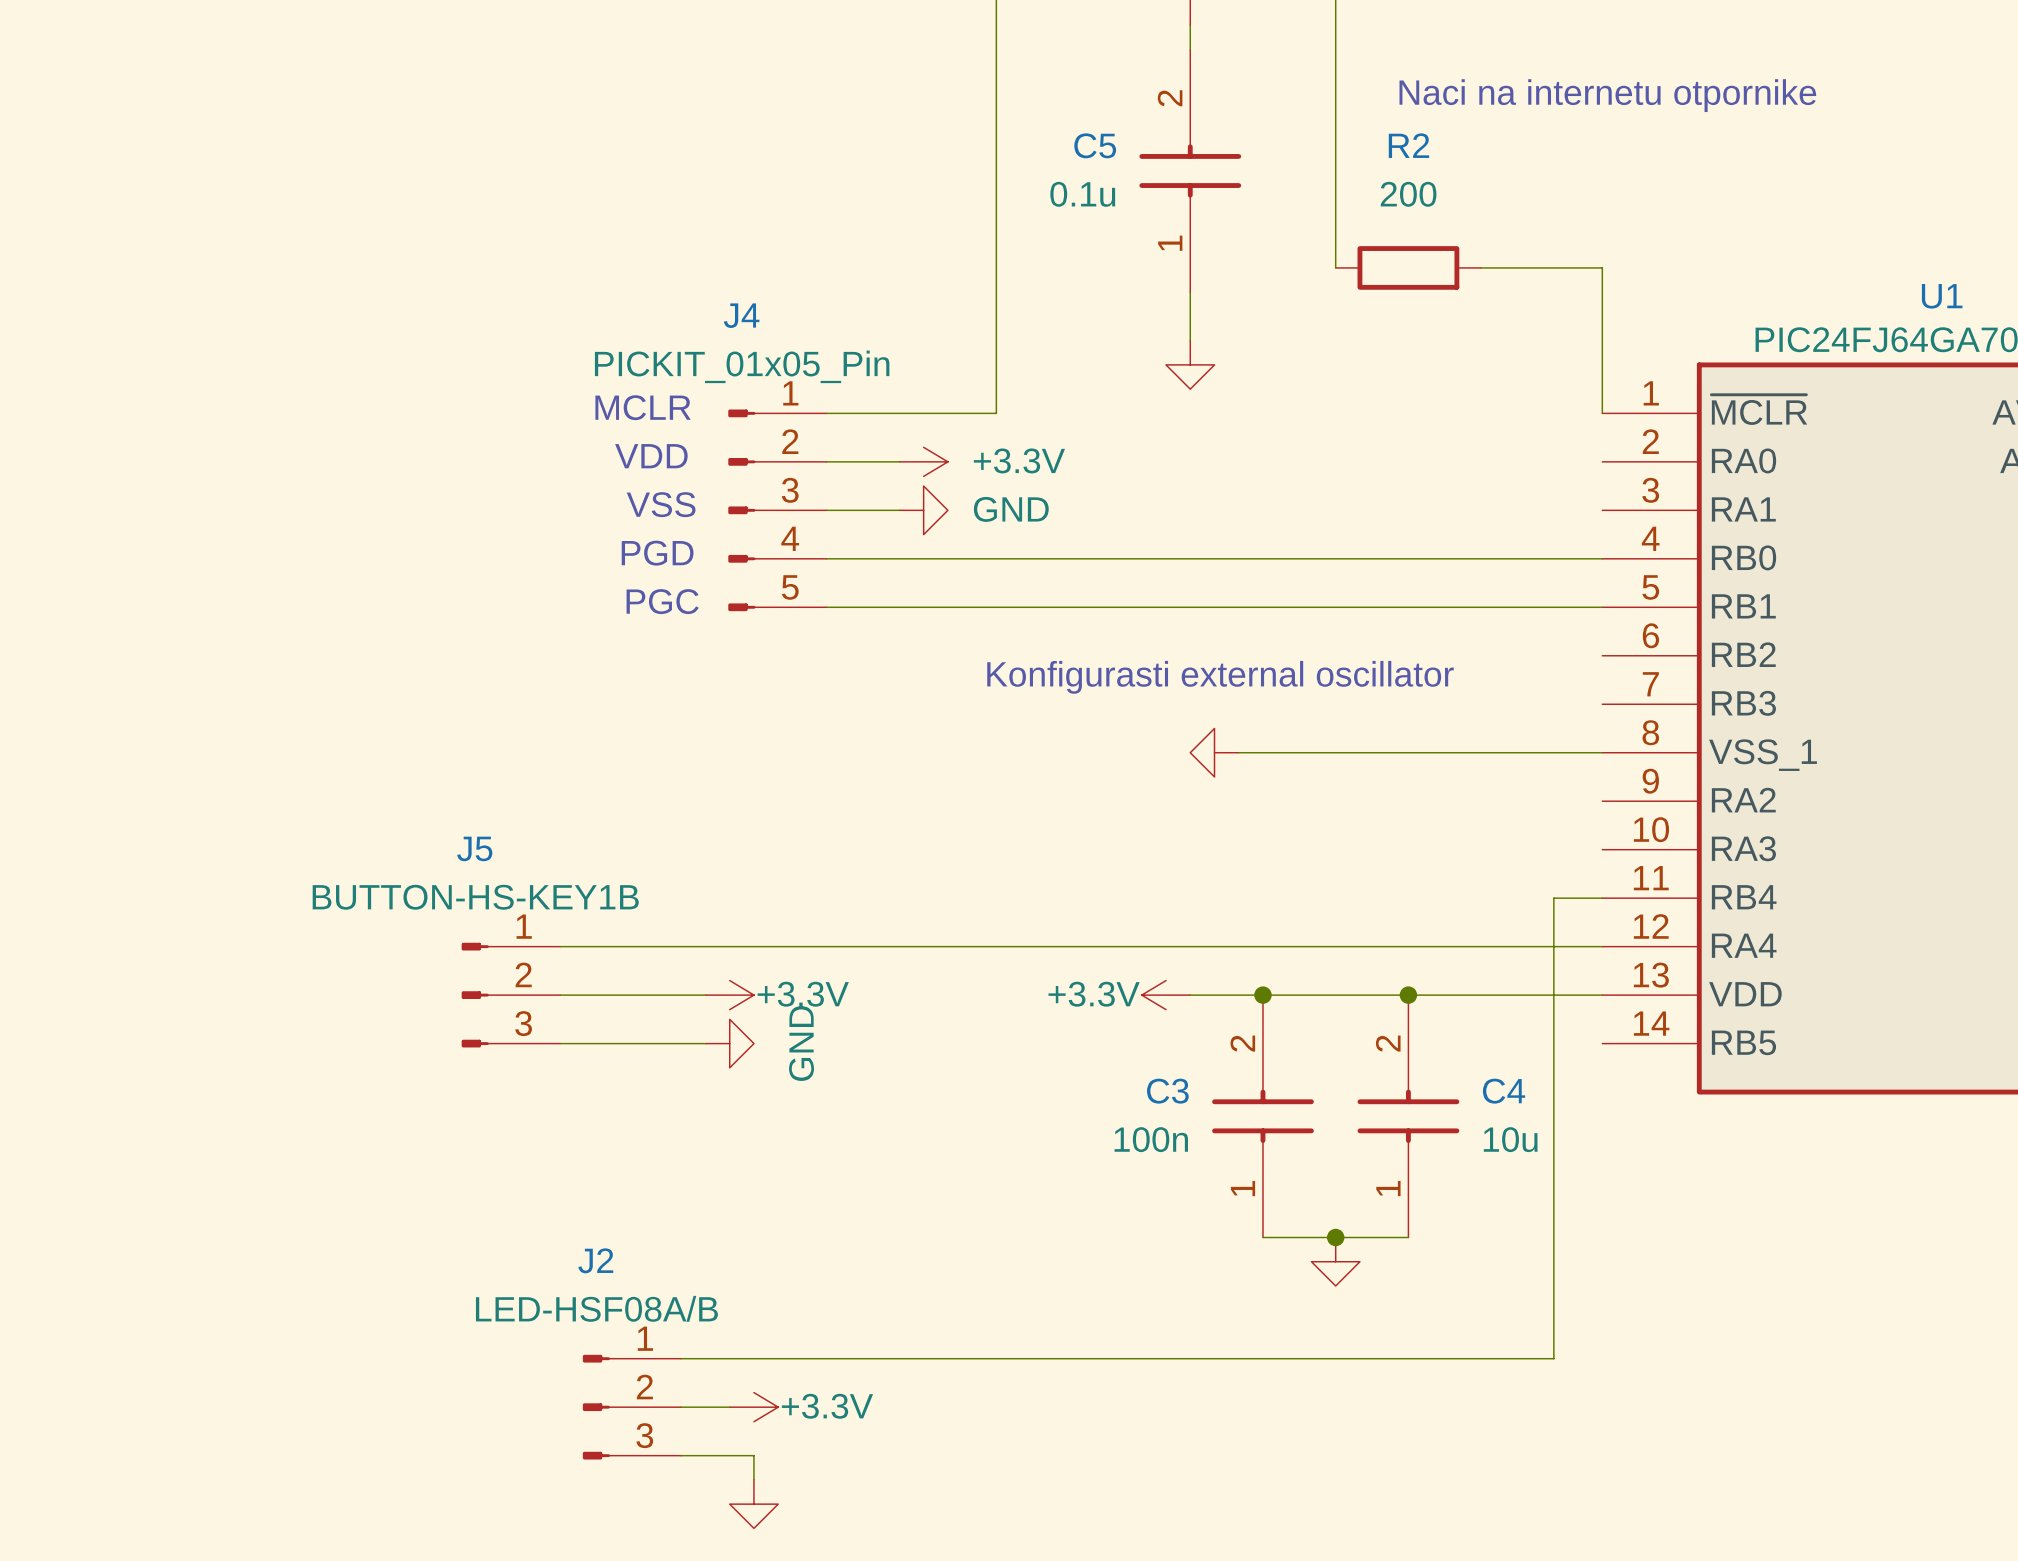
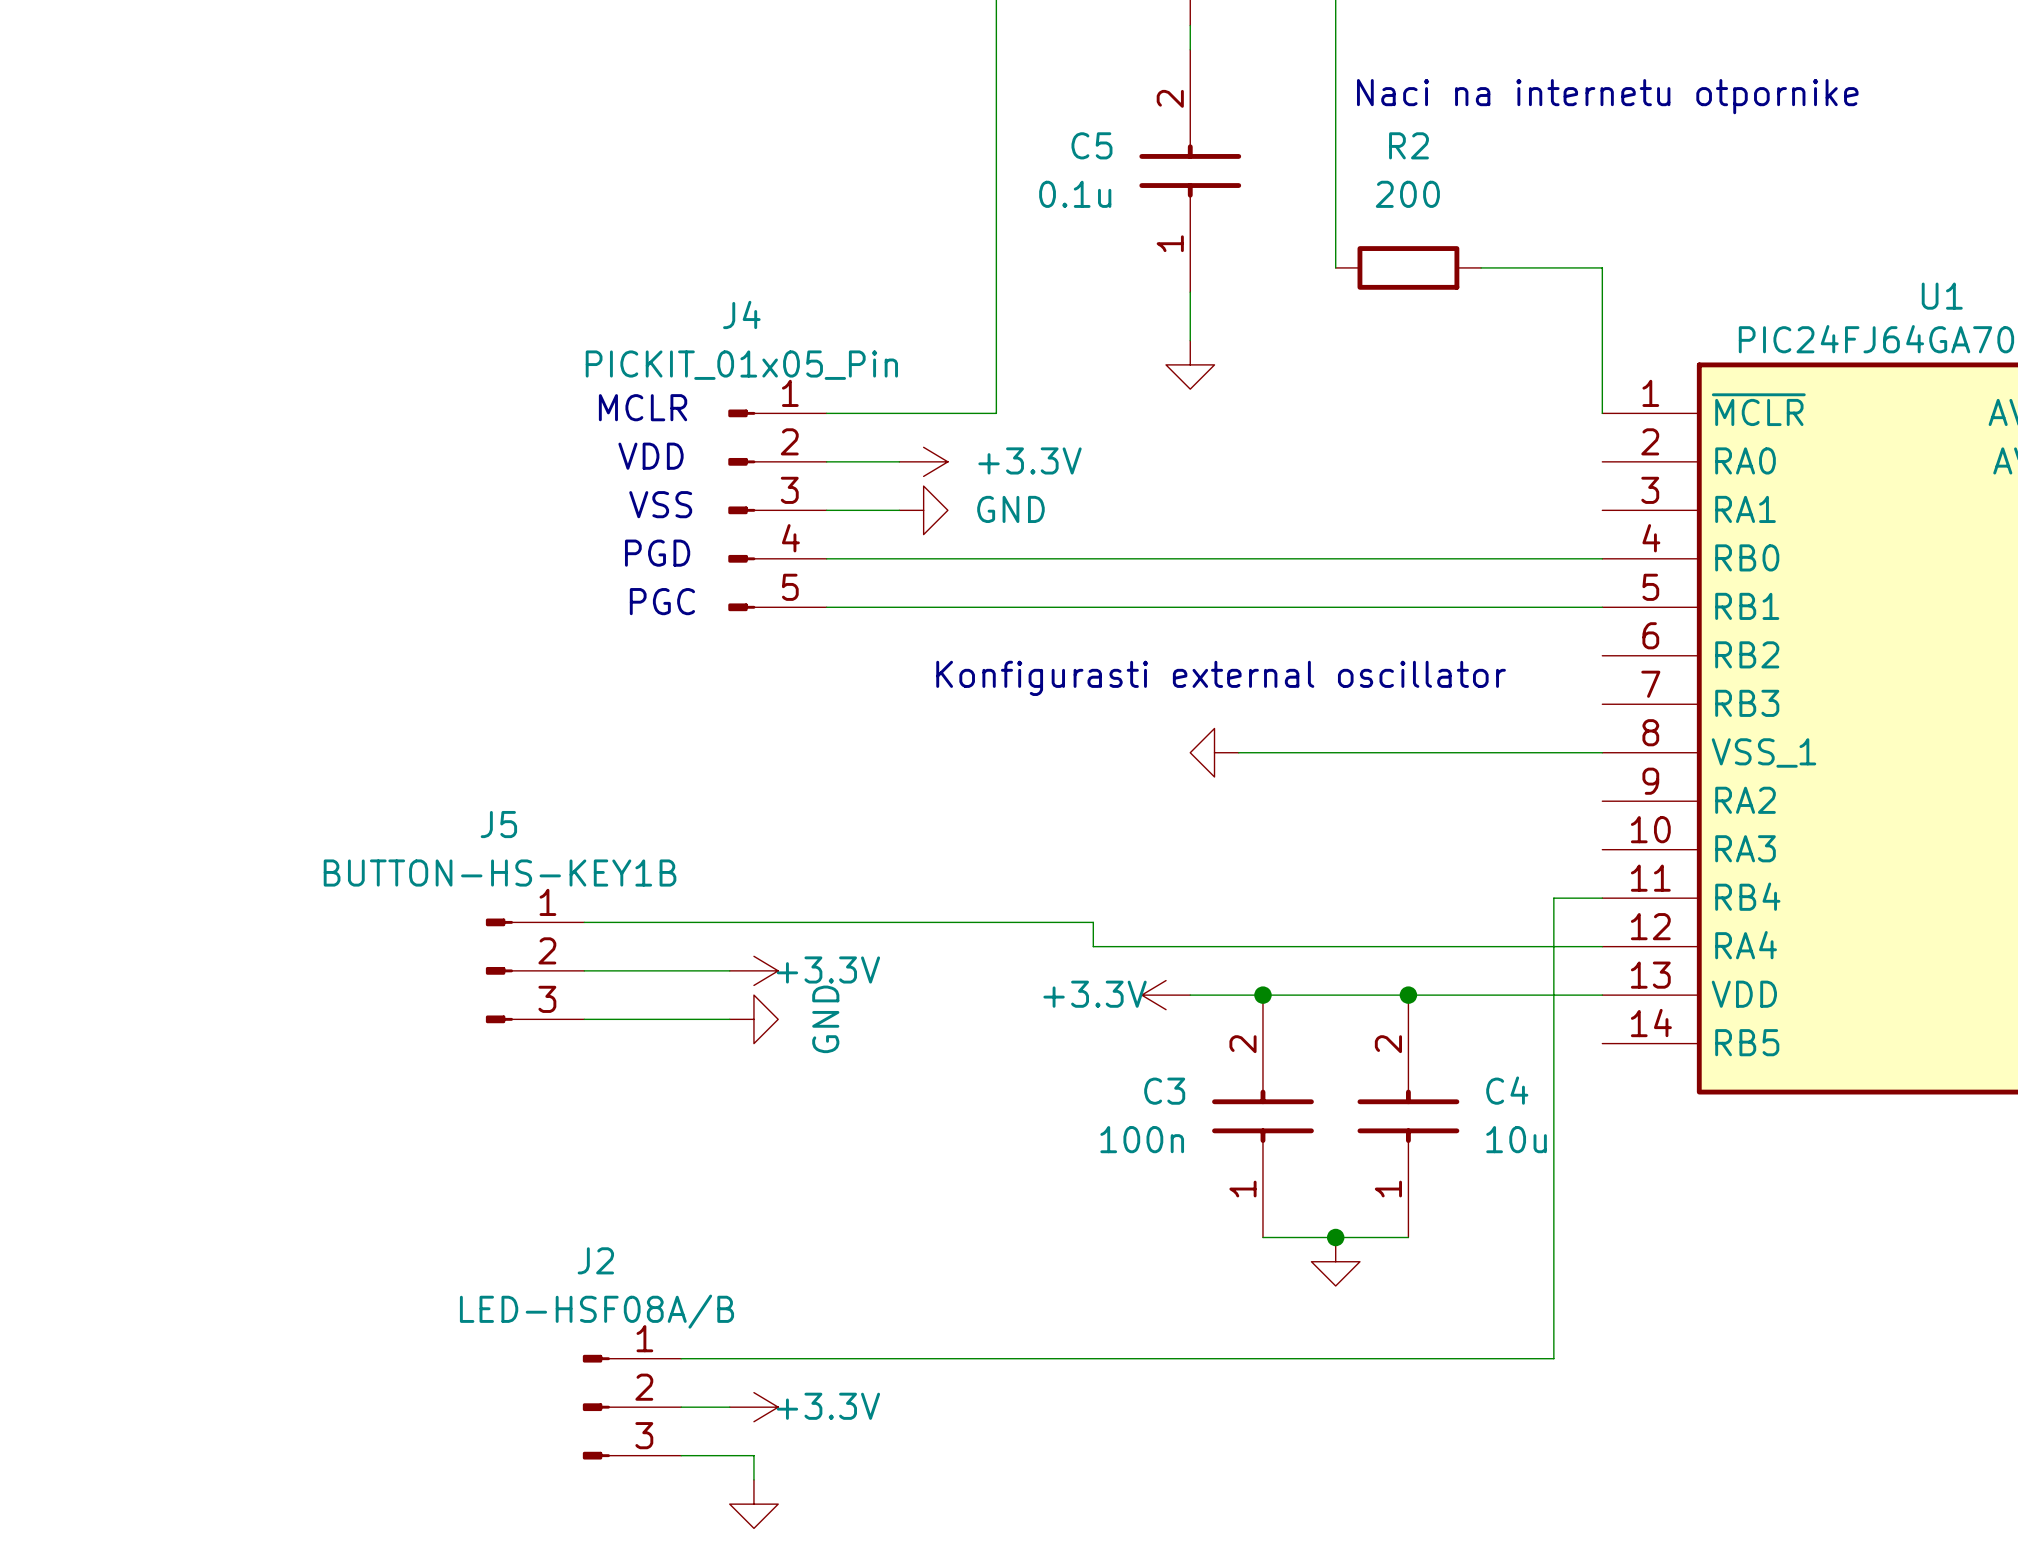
wire: (560, 946) (1093, 946) -> (584, 922) (1093, 922) (1093, 946)
J5 position: (510, 995) -> (535, 970)
wire: (560, 995) (705, 995) -> (584, 970) (729, 970)
power symbol position: +3.3V (729, 995) -> +3.3V (753, 970)
wire: (560, 1043) (705, 1043) -> (584, 1019) (729, 1019)
power symbol position: GND (729, 1043) -> GND (753, 1019)

